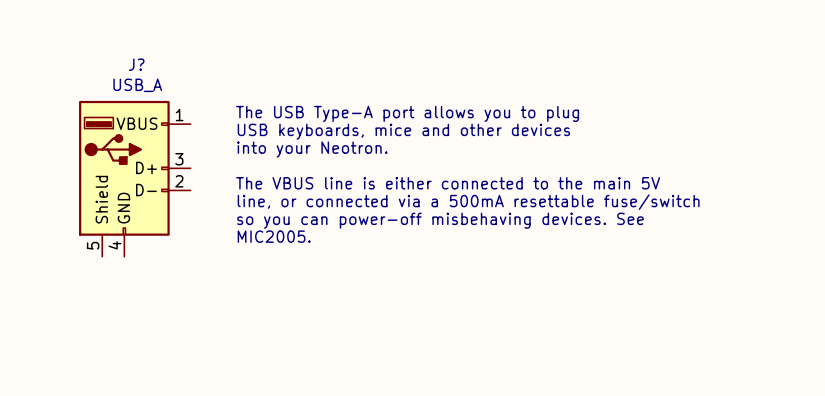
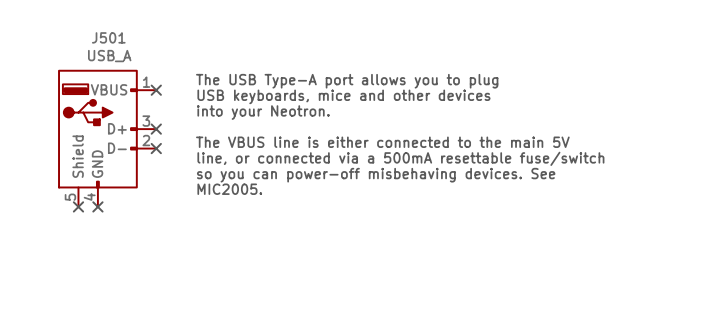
J? name: J? (136, 64) -> J501 (108, 37)
no-connect mark: none -> (156, 90)
no-connect mark: none -> (156, 129)
no-connect mark: none -> (156, 148)
no-connect mark: none -> (78, 206)
no-connect mark: none -> (97, 206)

